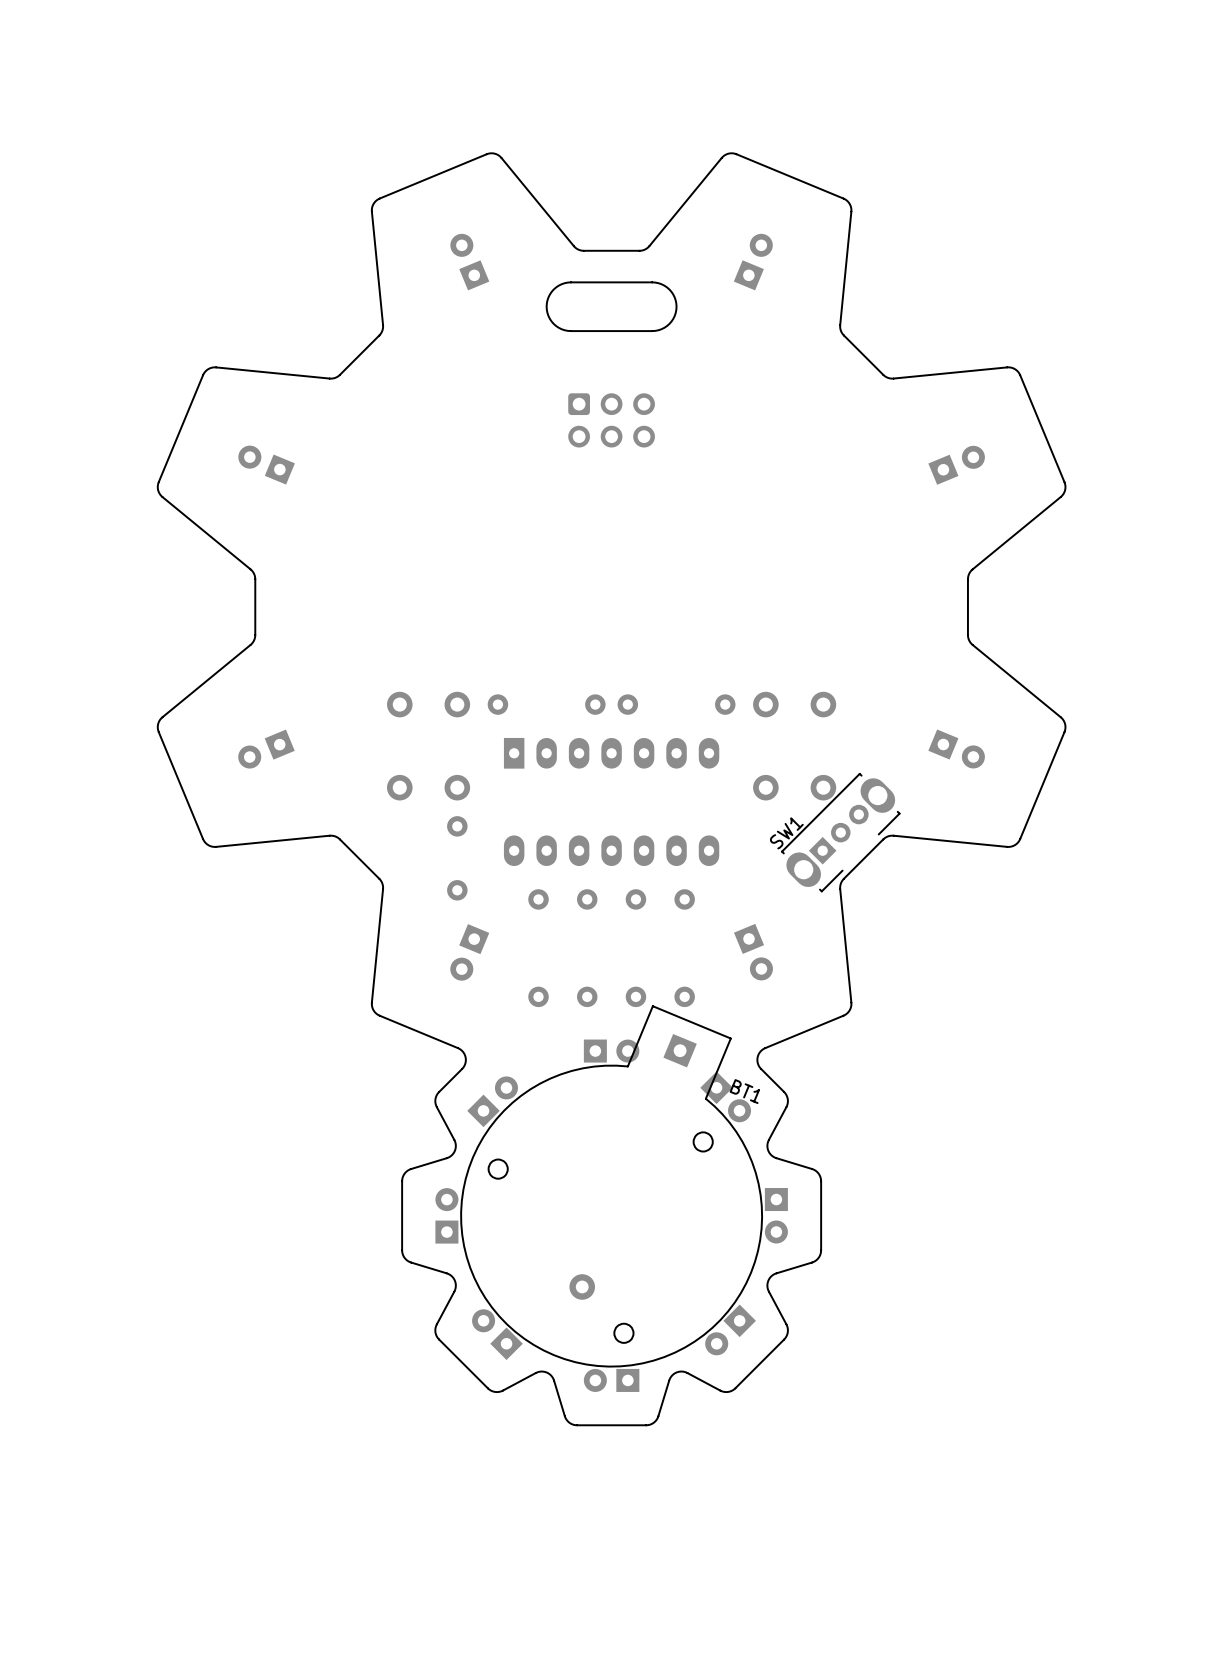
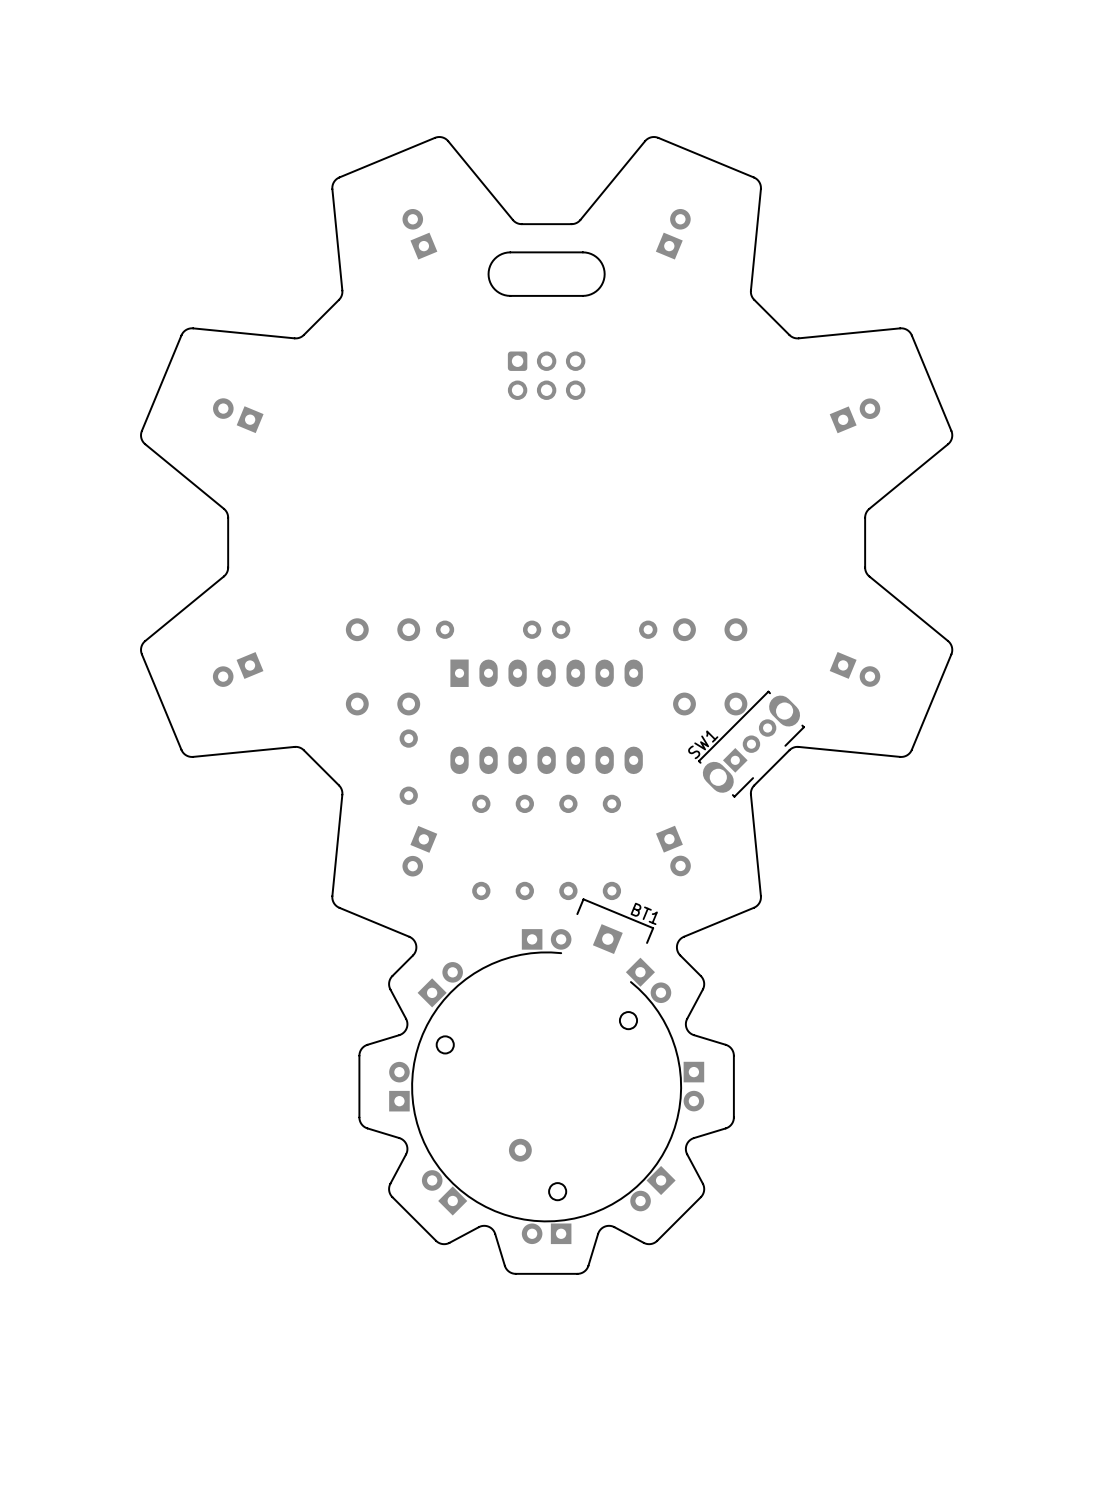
BT1 footprint: [460, 1005, 764, 1368] -> [411, 898, 682, 1223]
BT1 name position: BT1 (744, 1091) -> BT1 (644, 913)

